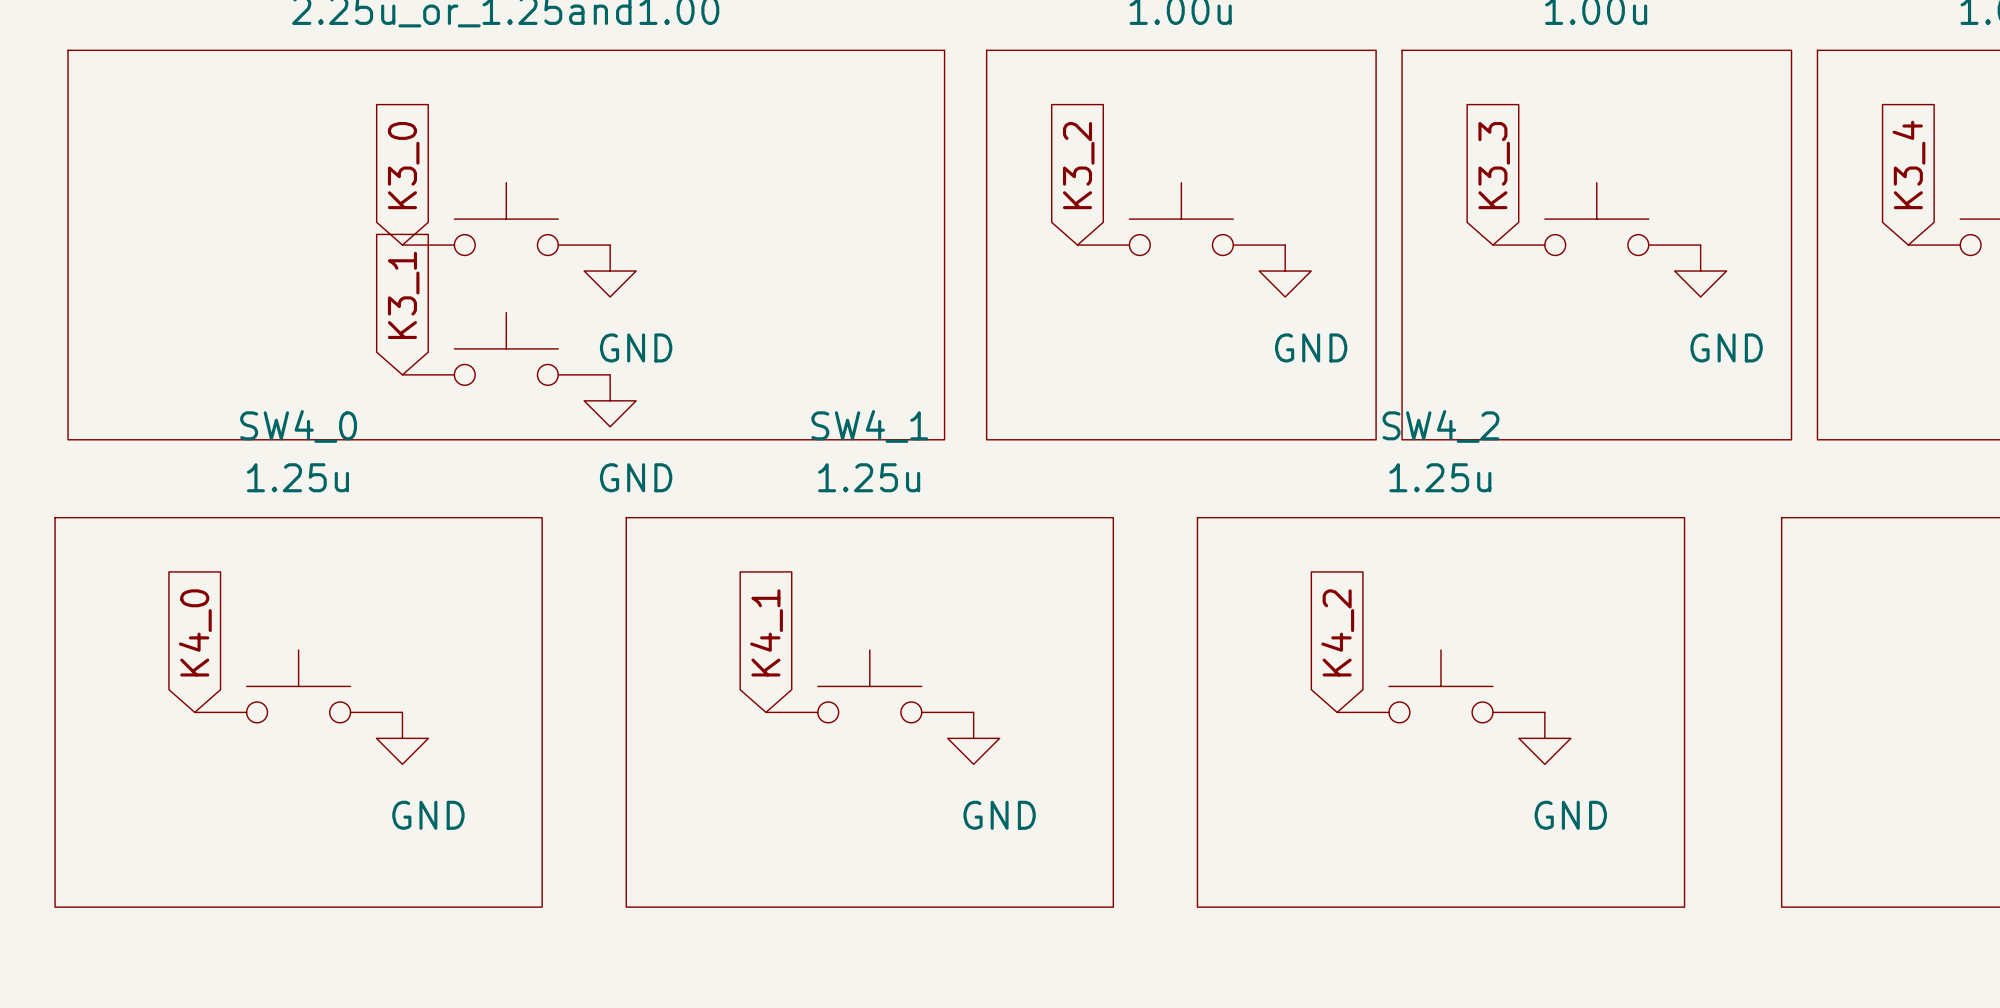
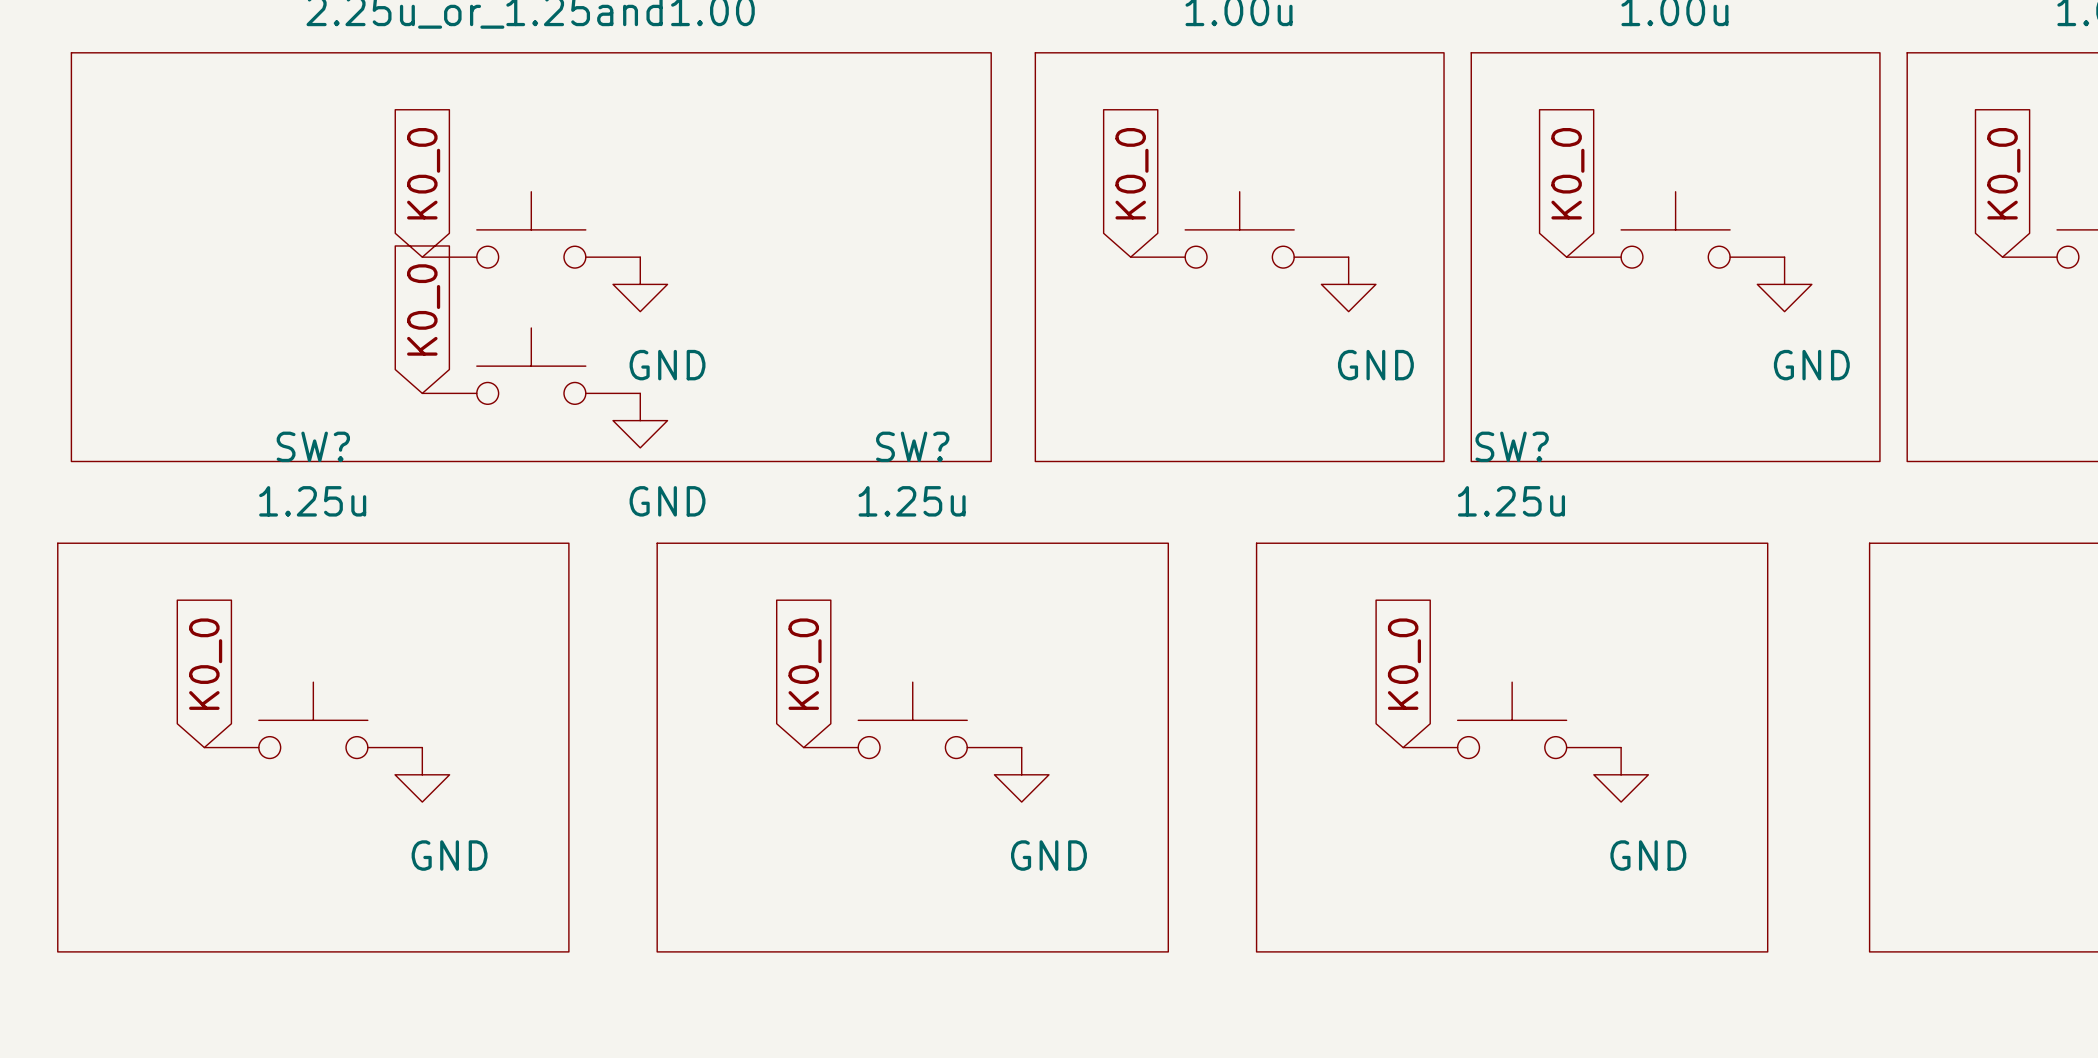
global label: K3_4 (1908, 164) -> K0_0 (2003, 173)
global label: K3_0 (403, 165) -> K0_0 (423, 173)
global label: K3_2 (1078, 165) -> K0_0 (1131, 173)
global label: K3_3 (1494, 165) -> K0_0 (1567, 173)
global label: K3_1 (403, 295) -> K0_0 (423, 309)
SW4_0 name: SW4_0 (298, 426) -> SW? (313, 446)
SW4_1 name: SW4_1 (869, 426) -> SW? (912, 446)
SW4_2 name: SW4_2 (1440, 426) -> SW? (1512, 446)
global label: K4_0 (195, 632) -> K0_0 (205, 664)
global label: K4_1 (766, 632) -> K0_0 (805, 664)
global label: K4_2 (1337, 632) -> K0_0 (1404, 664)

